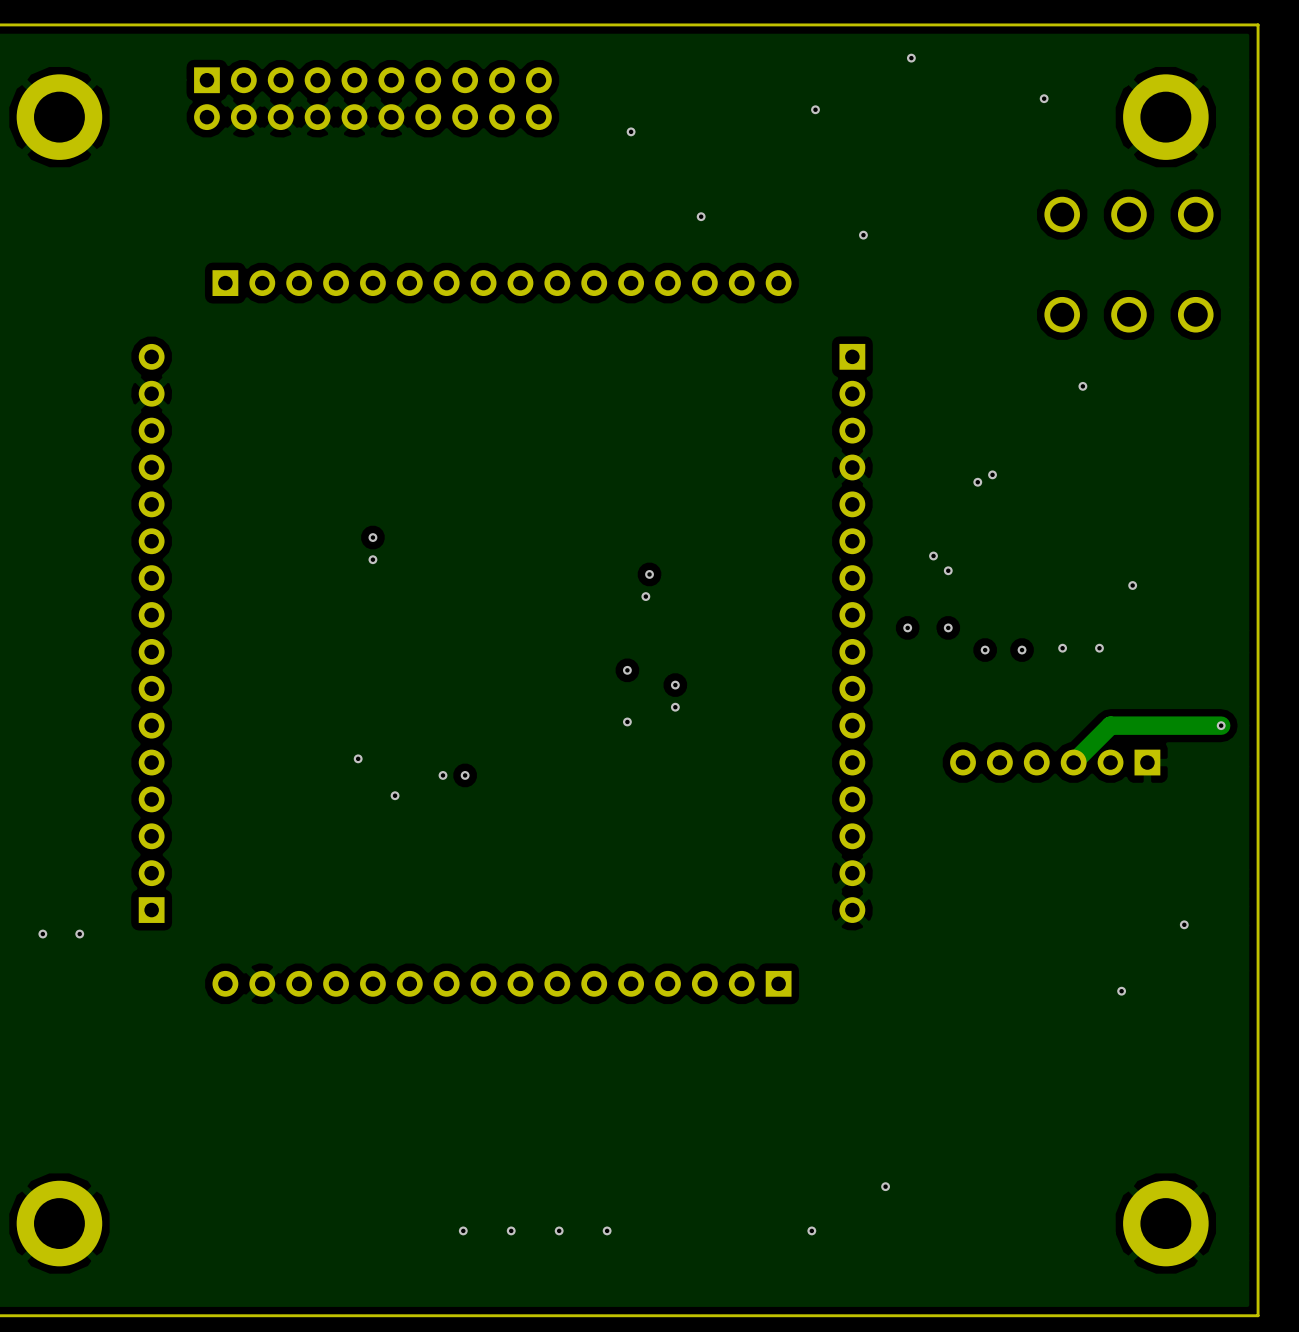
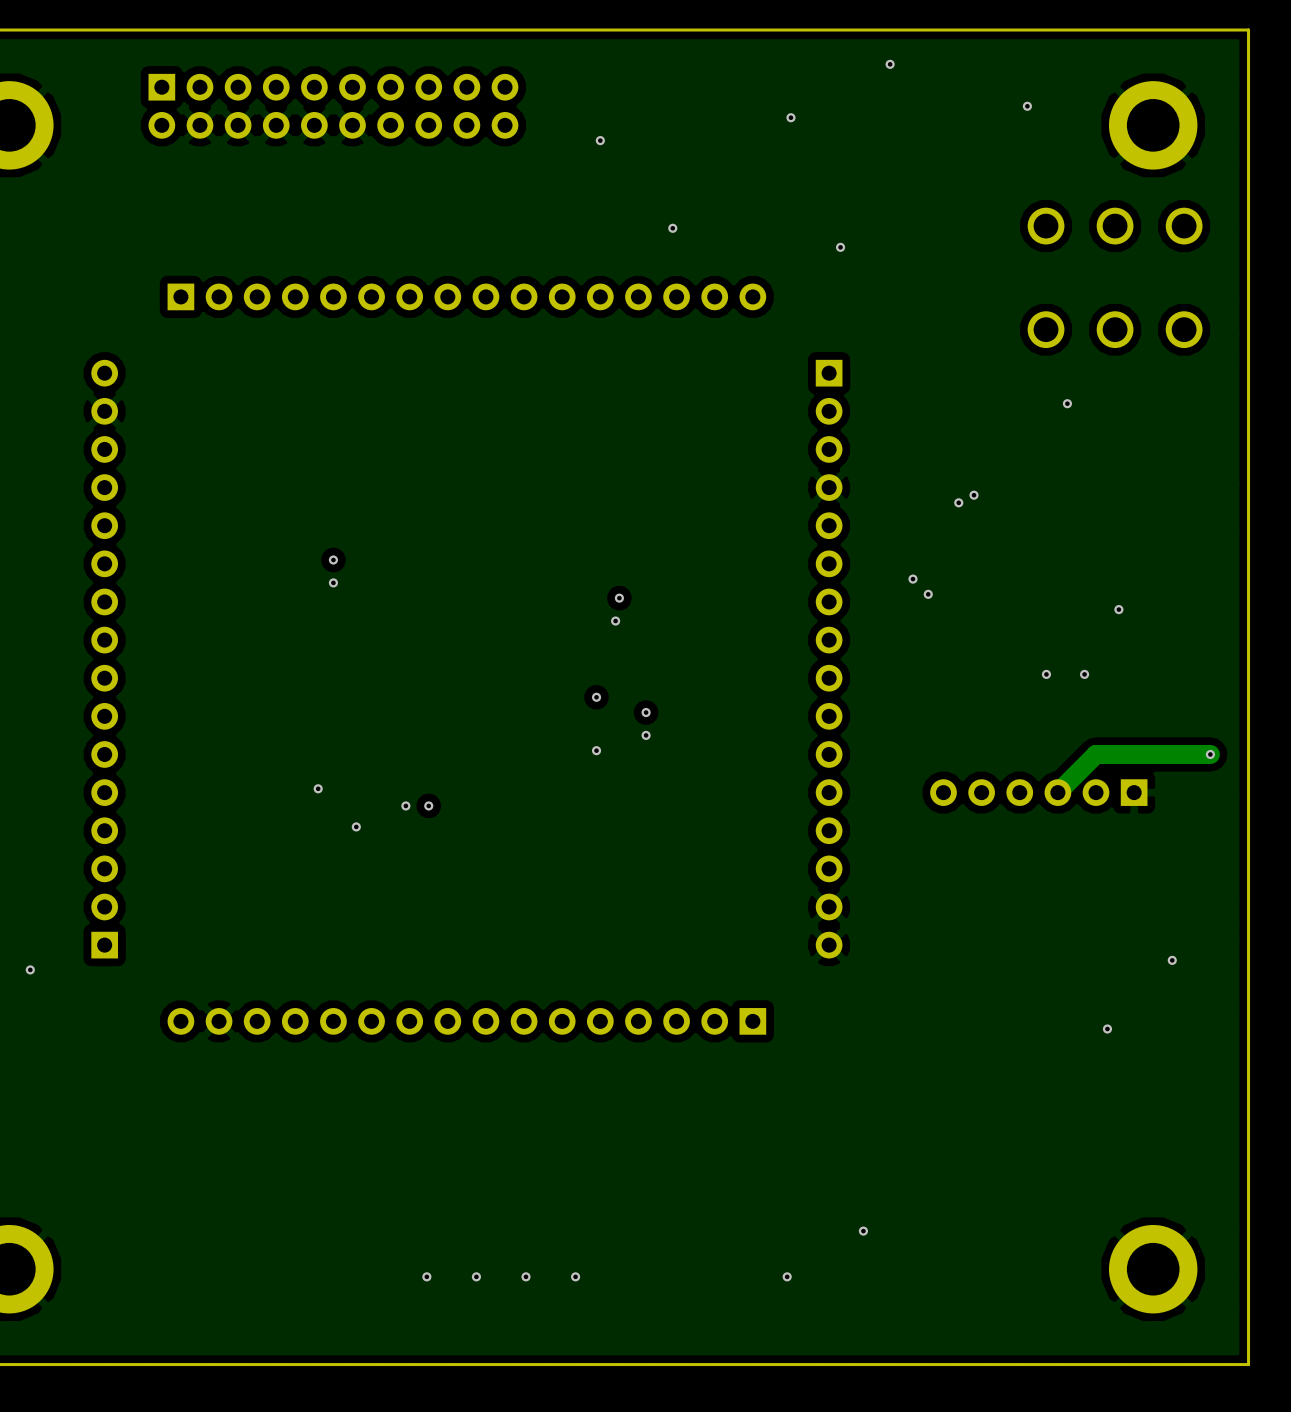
via: (907, 627) -> none
via: (948, 627) -> none
via: (985, 650) -> none
via: (1022, 650) -> none

